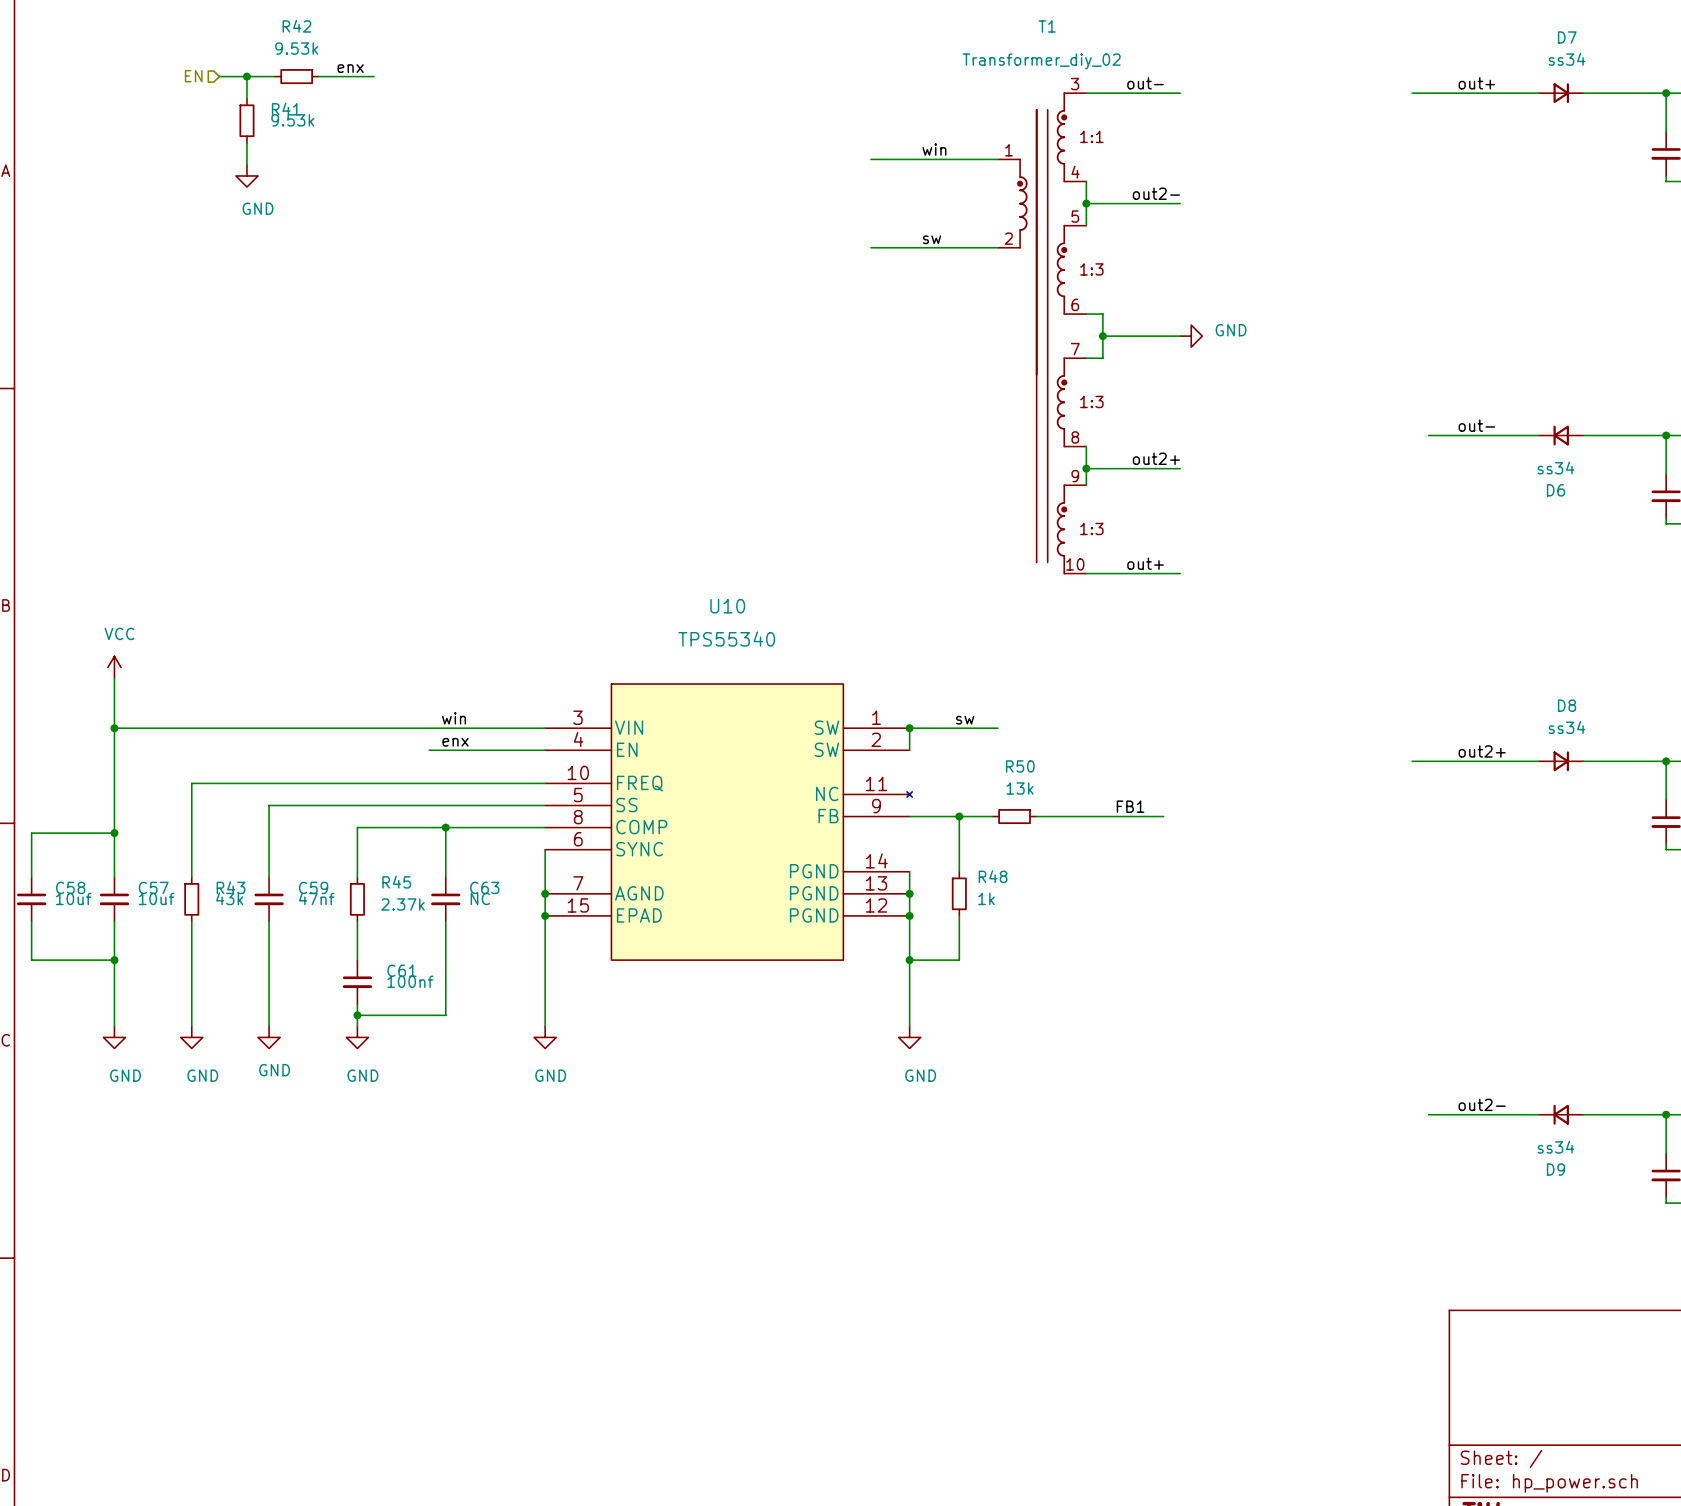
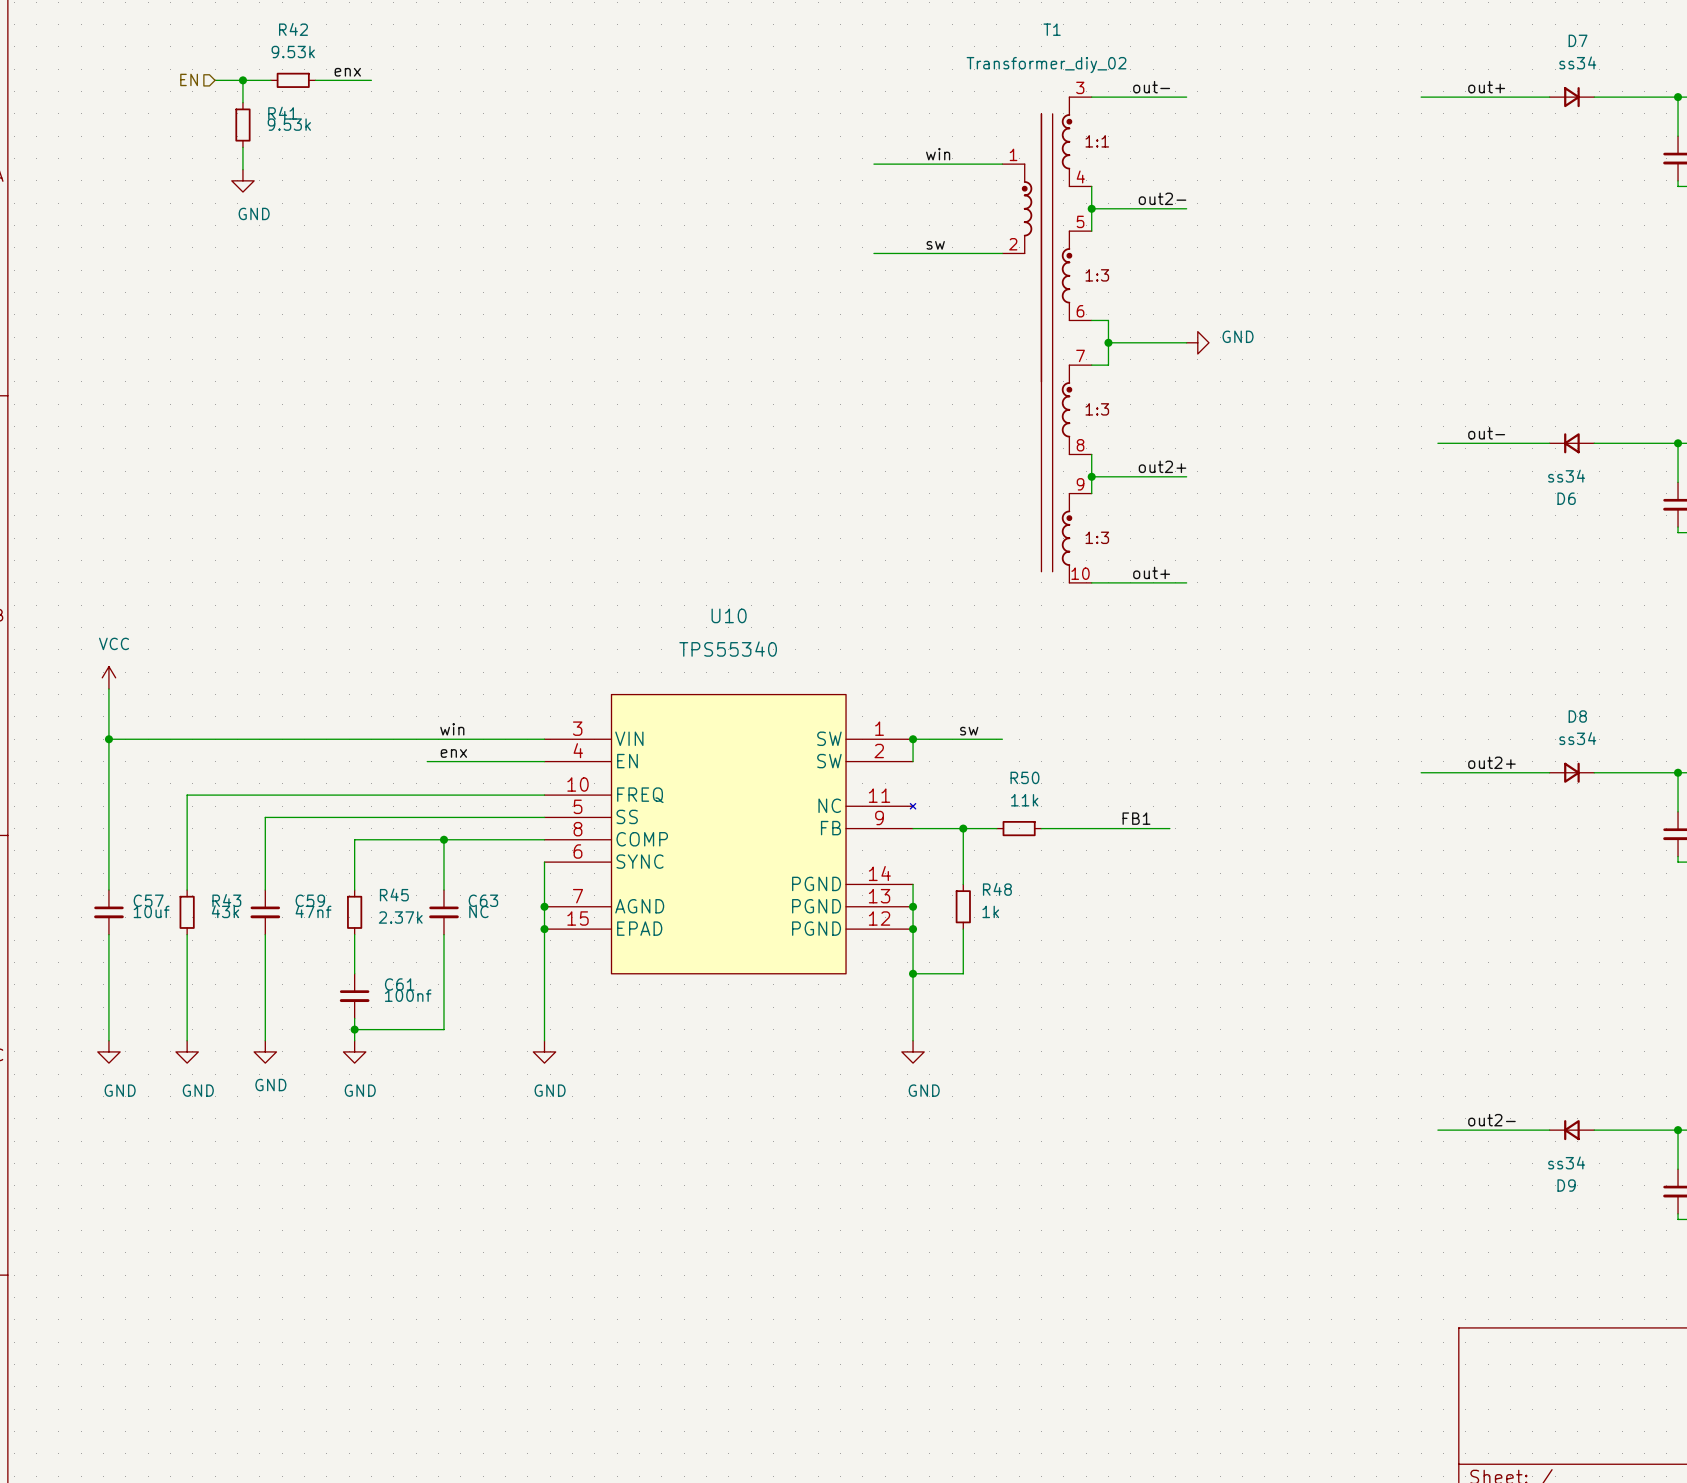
R50 value: 13k (1020, 788) -> 11k (1024, 800)
wire: (114, 833) (31, 833) (31, 877) -> none
junction: (114, 833) -> none
C58: 10uf (31, 899) -> none
wire: (31, 921) (31, 960) (114, 960) -> none
junction: (114, 960) -> none

